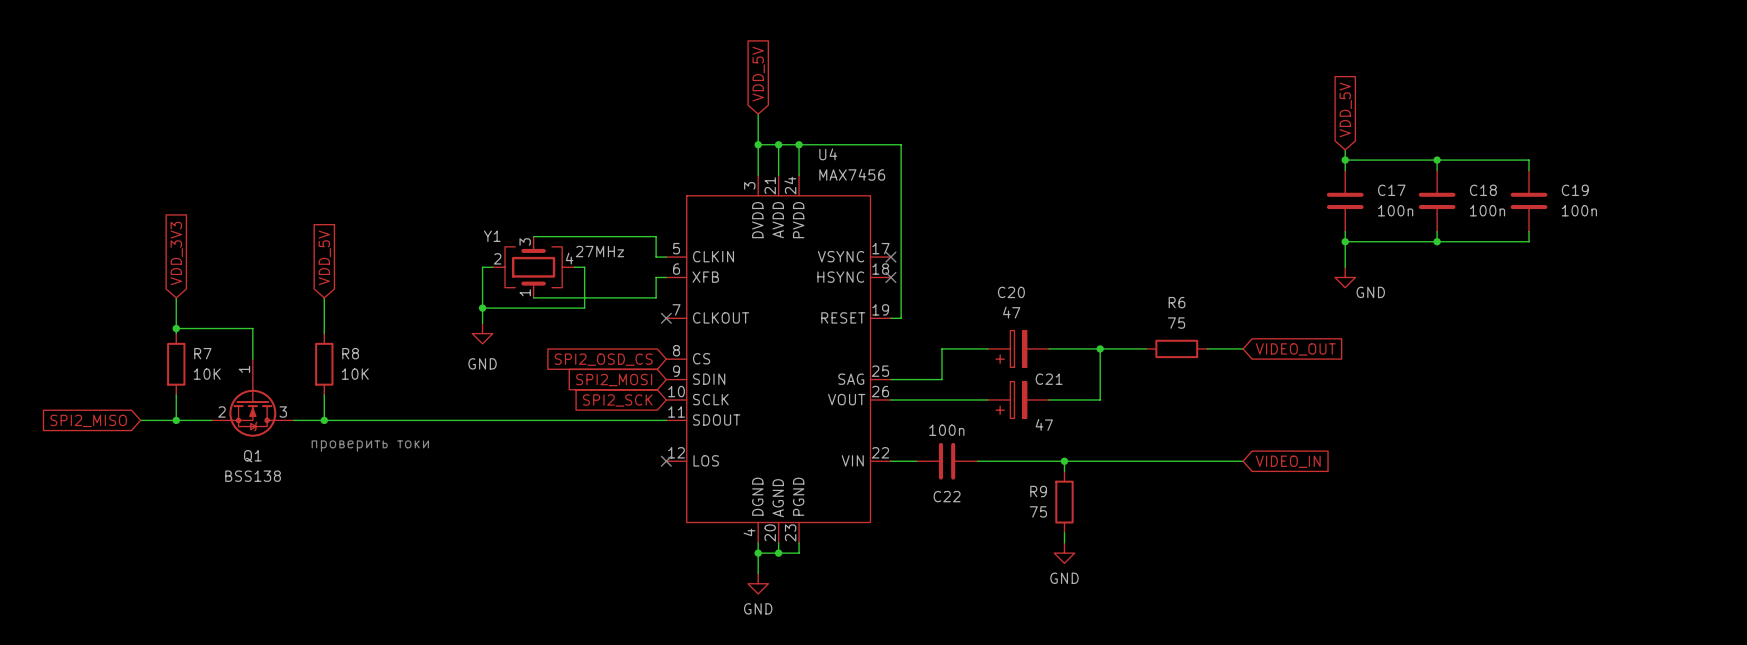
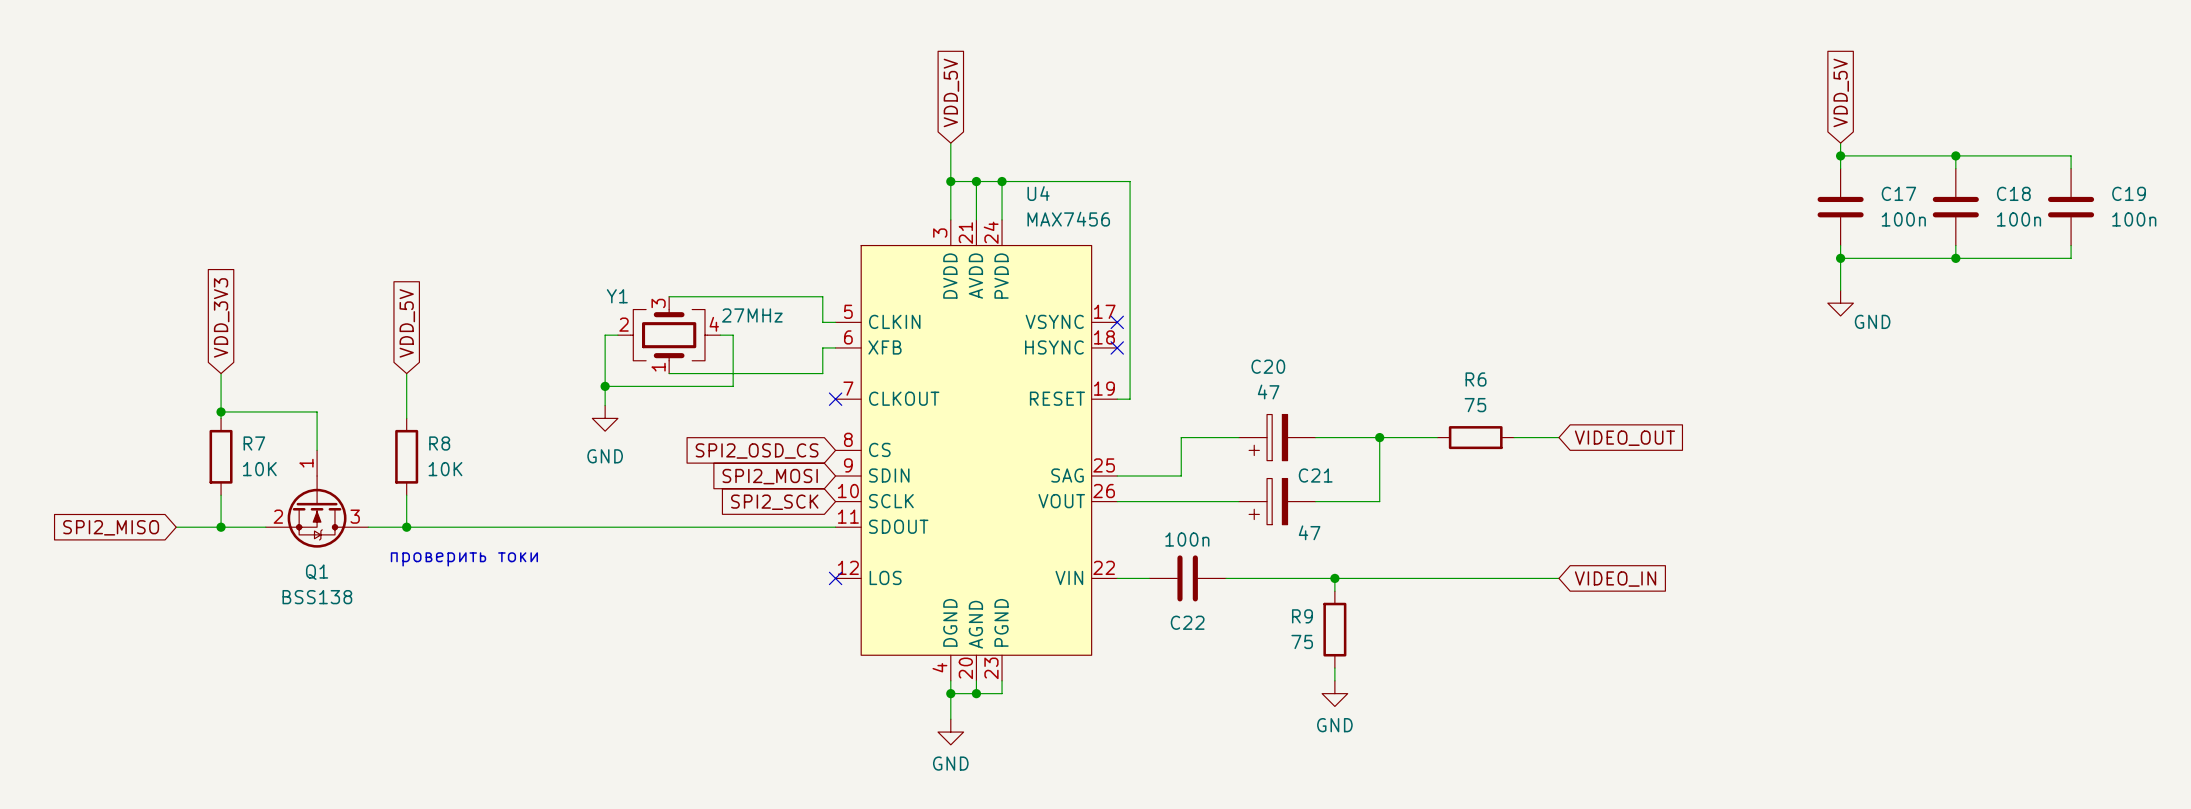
global label position: VDD_5V (1345, 109) -> VDD_5V (1841, 92)
junction: none -> (1840, 155)
junction: none -> (1955, 155)
wire: (1345, 149) (1345, 170) -> (1840, 143) (1840, 168)
wire: (1345, 160) (1529, 160) (1529, 170) -> (1840, 155) (2071, 155) (2071, 168)
junction: (1345, 160) -> none
wire: (1437, 160) (1437, 170) -> (1955, 155) (1955, 168)
junction: (1437, 160) -> none
C17 position: (1345, 200) -> (1840, 207)
C18 position: (1437, 200) -> (1955, 207)
C19 position: (1529, 200) -> (2071, 207)
junction: none -> (1840, 258)
junction: none -> (1955, 258)
wire: (1345, 231) (1345, 267) -> (1840, 245) (1840, 290)
wire: (1437, 231) (1437, 241) -> (1955, 245) (1955, 258)
wire: (1529, 231) (1529, 241) (1345, 241) -> (2071, 245) (2071, 258) (1840, 258)
junction: (1345, 241) -> none
junction: (1437, 241) -> none
power symbol position: GND (1345, 277) -> GND (1840, 303)

